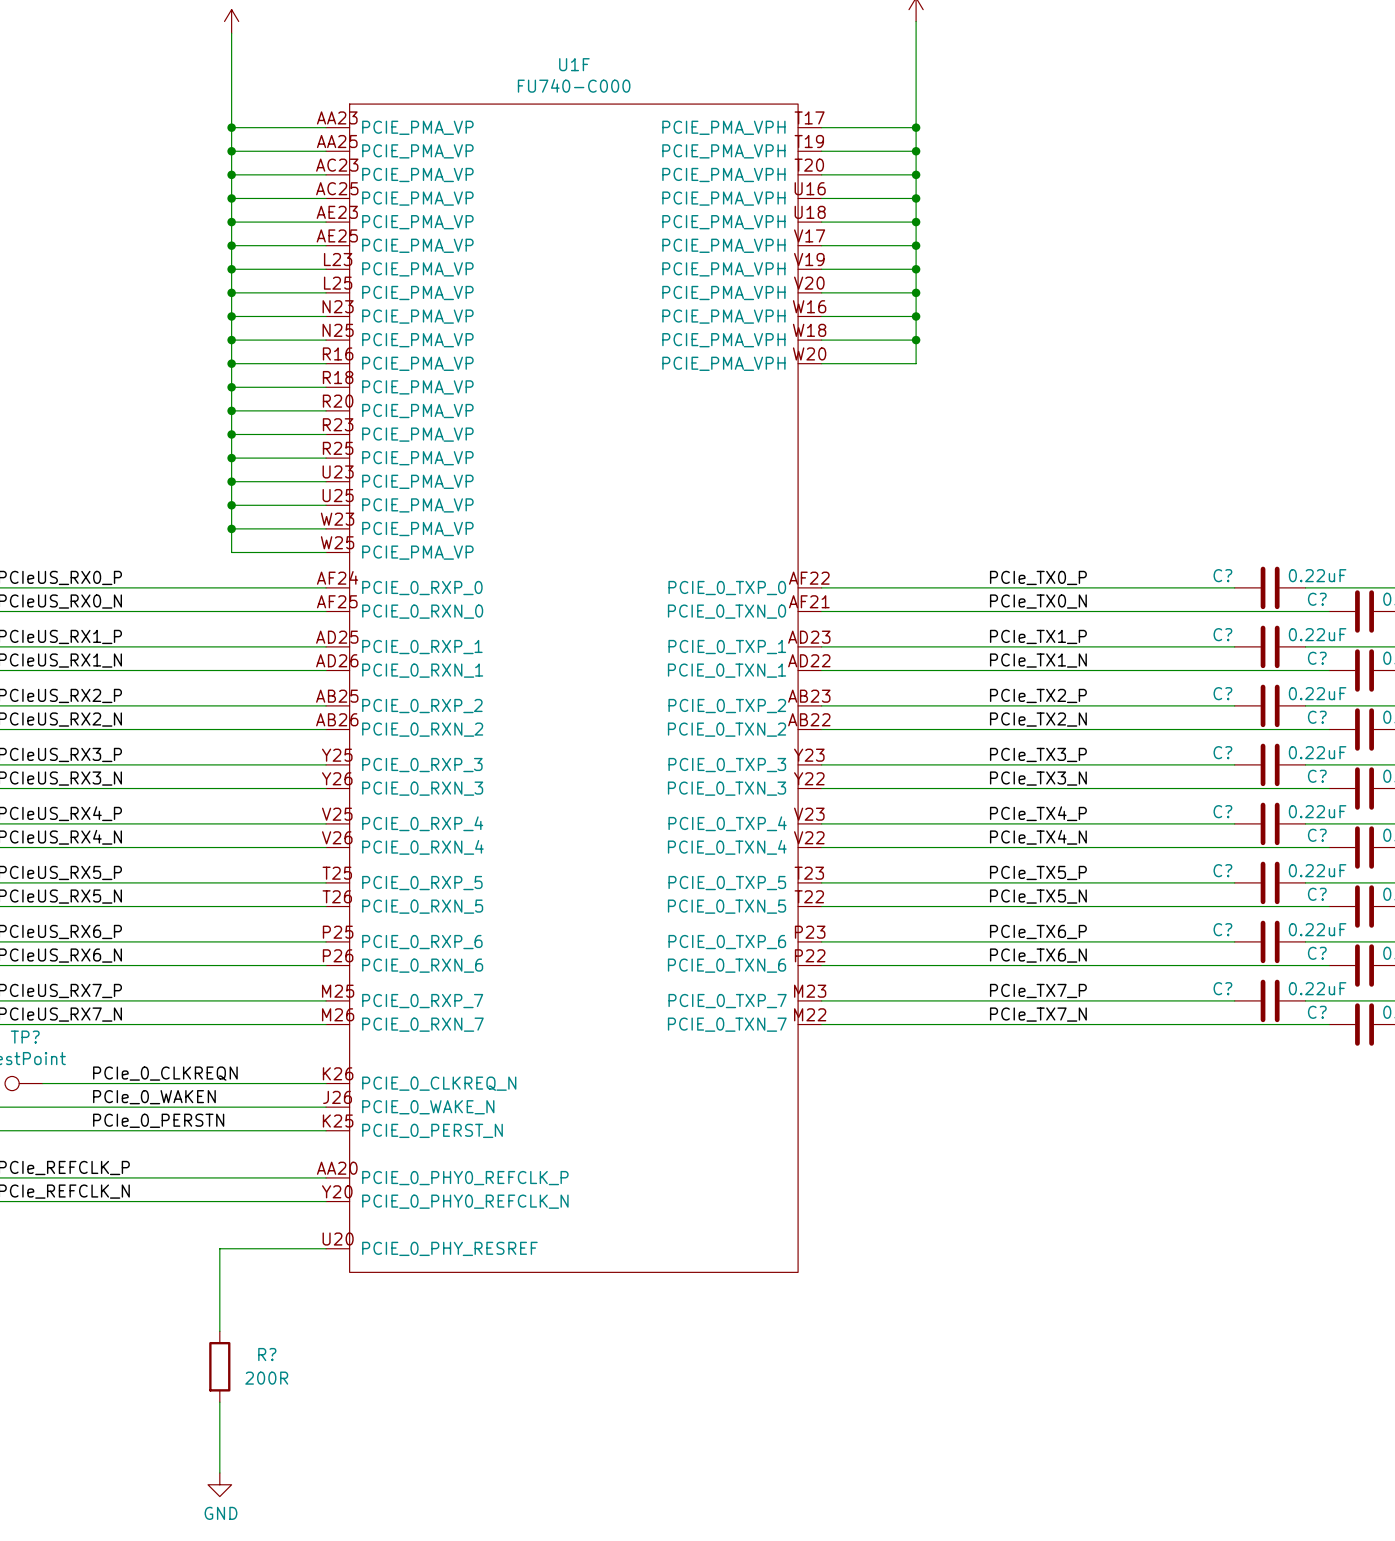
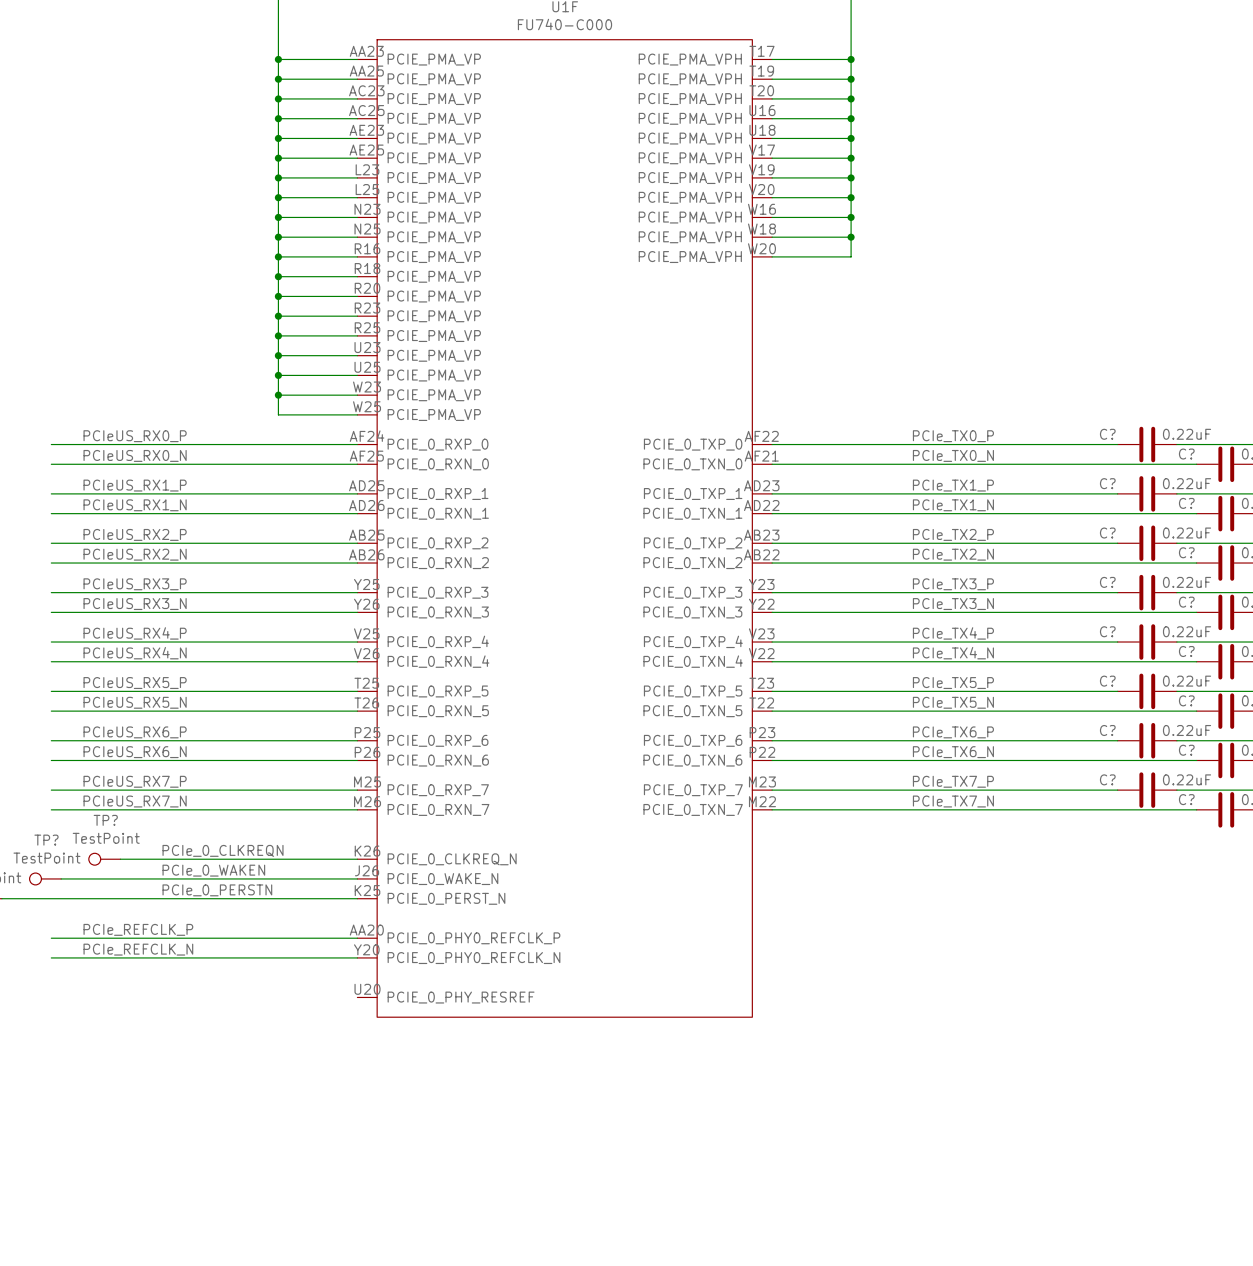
wire: (326, 1248) (219, 1248) (219, 1331) -> none
R?: 200R (219, 1366) -> none
wire: (219, 1402) (219, 1472) -> none
power symbol: GND (219, 1484) -> none

